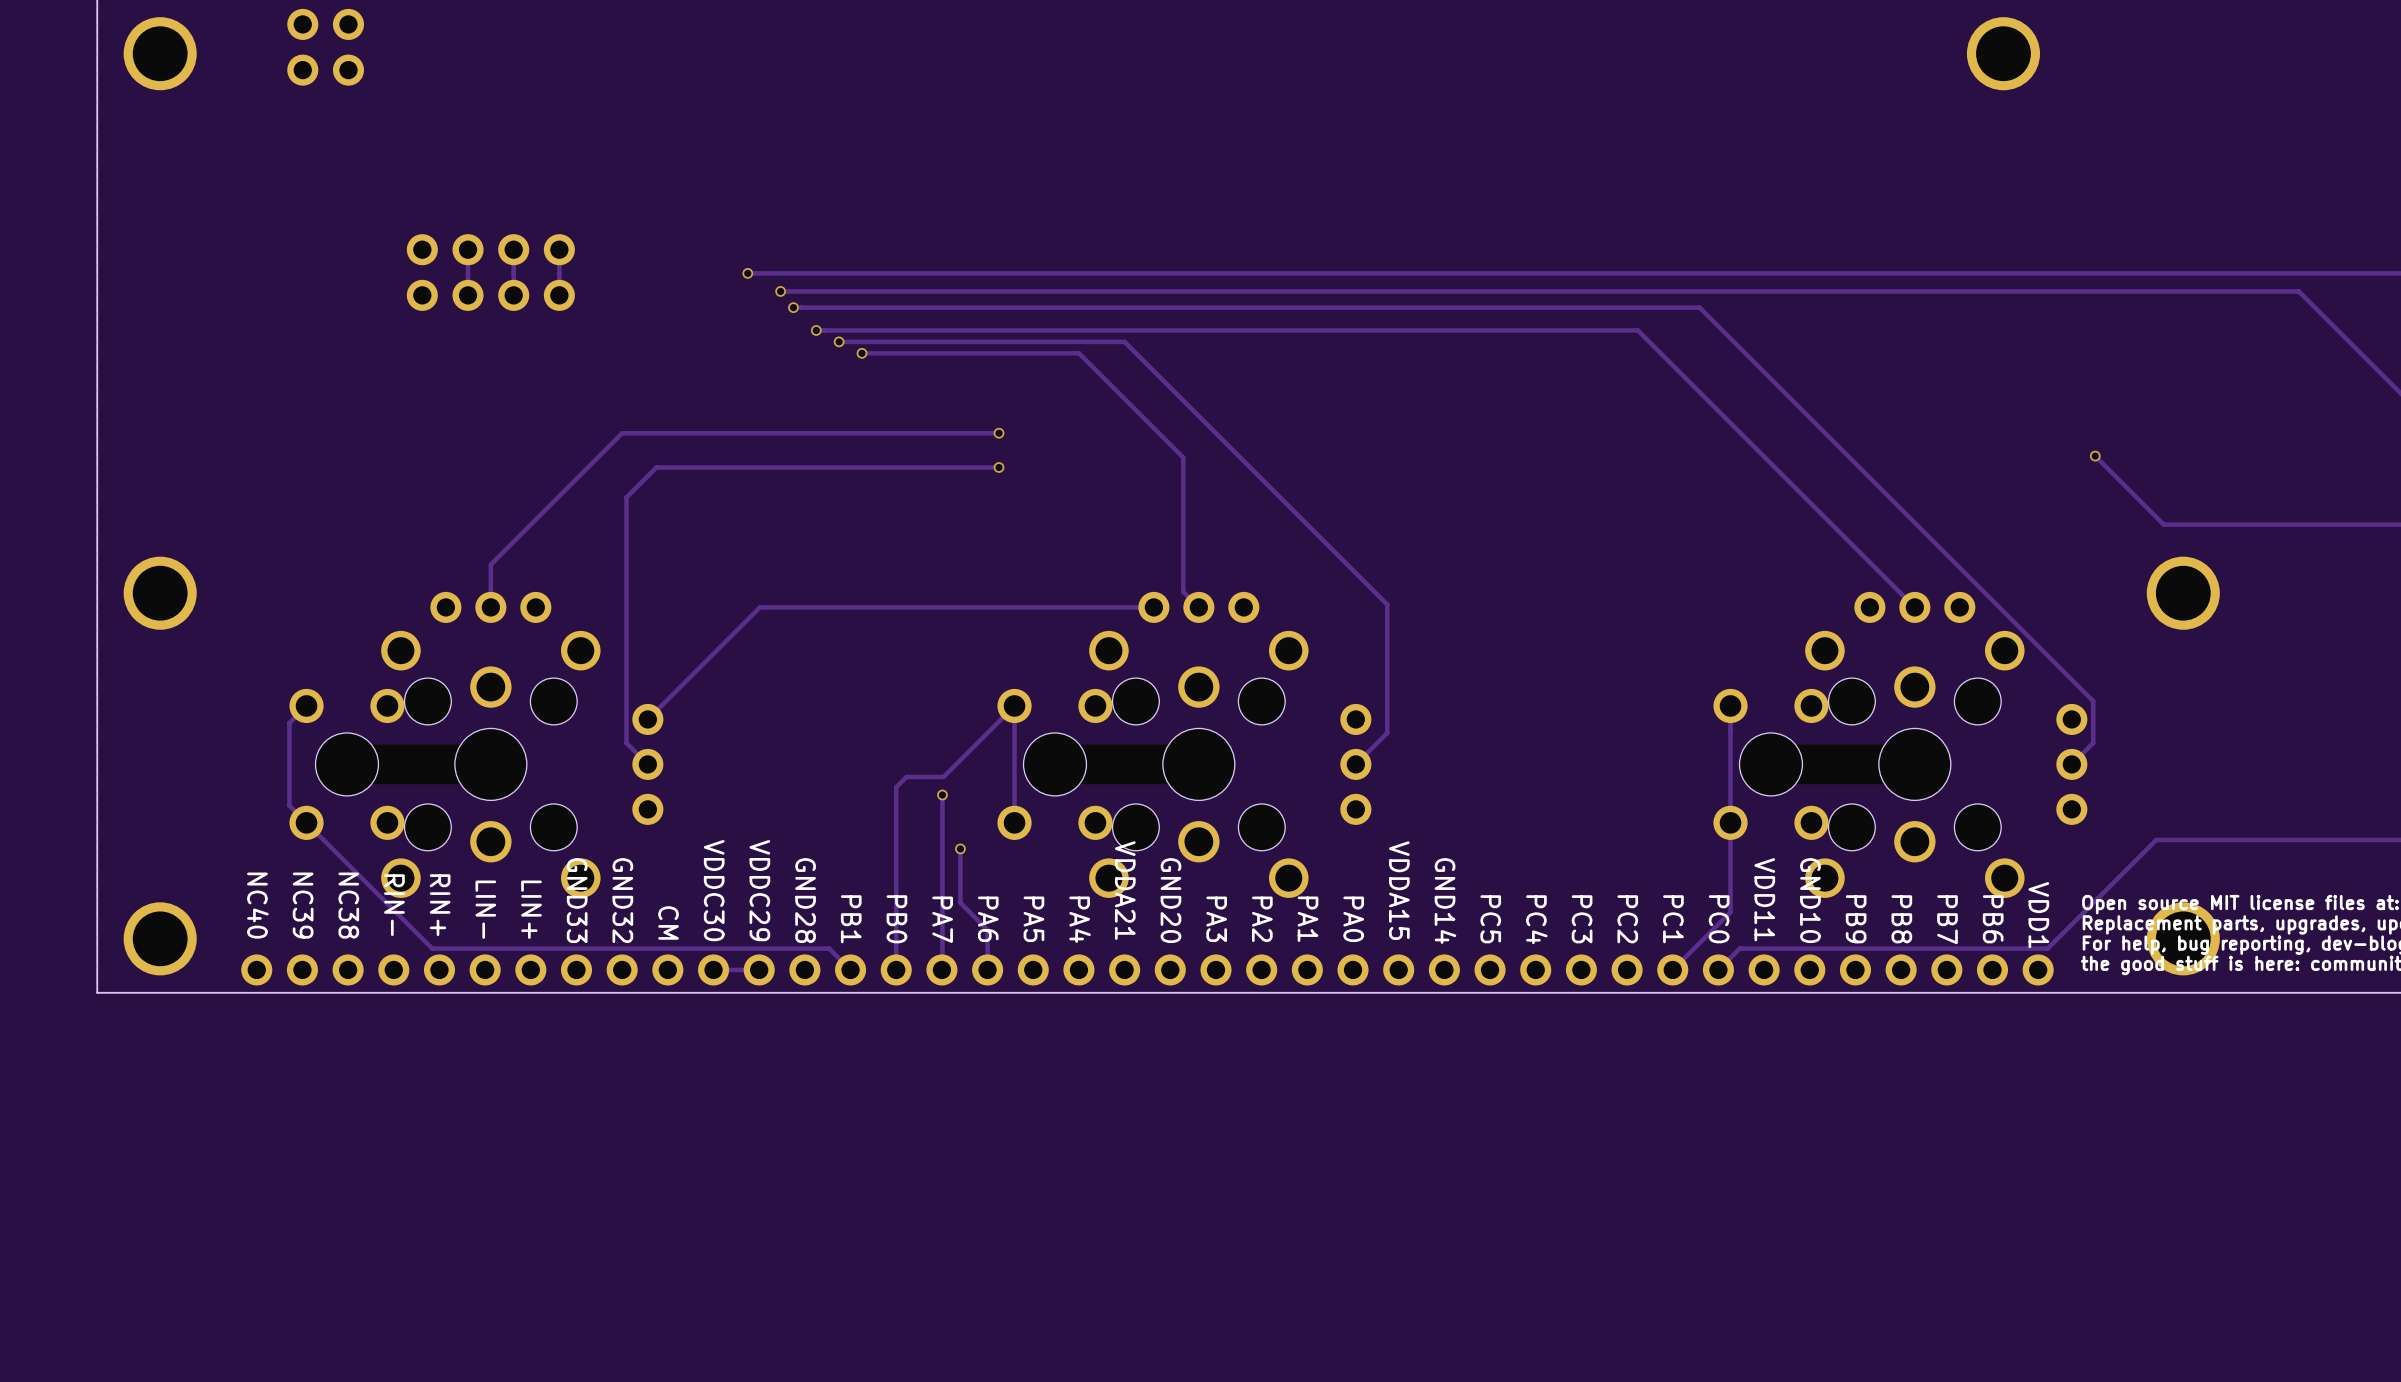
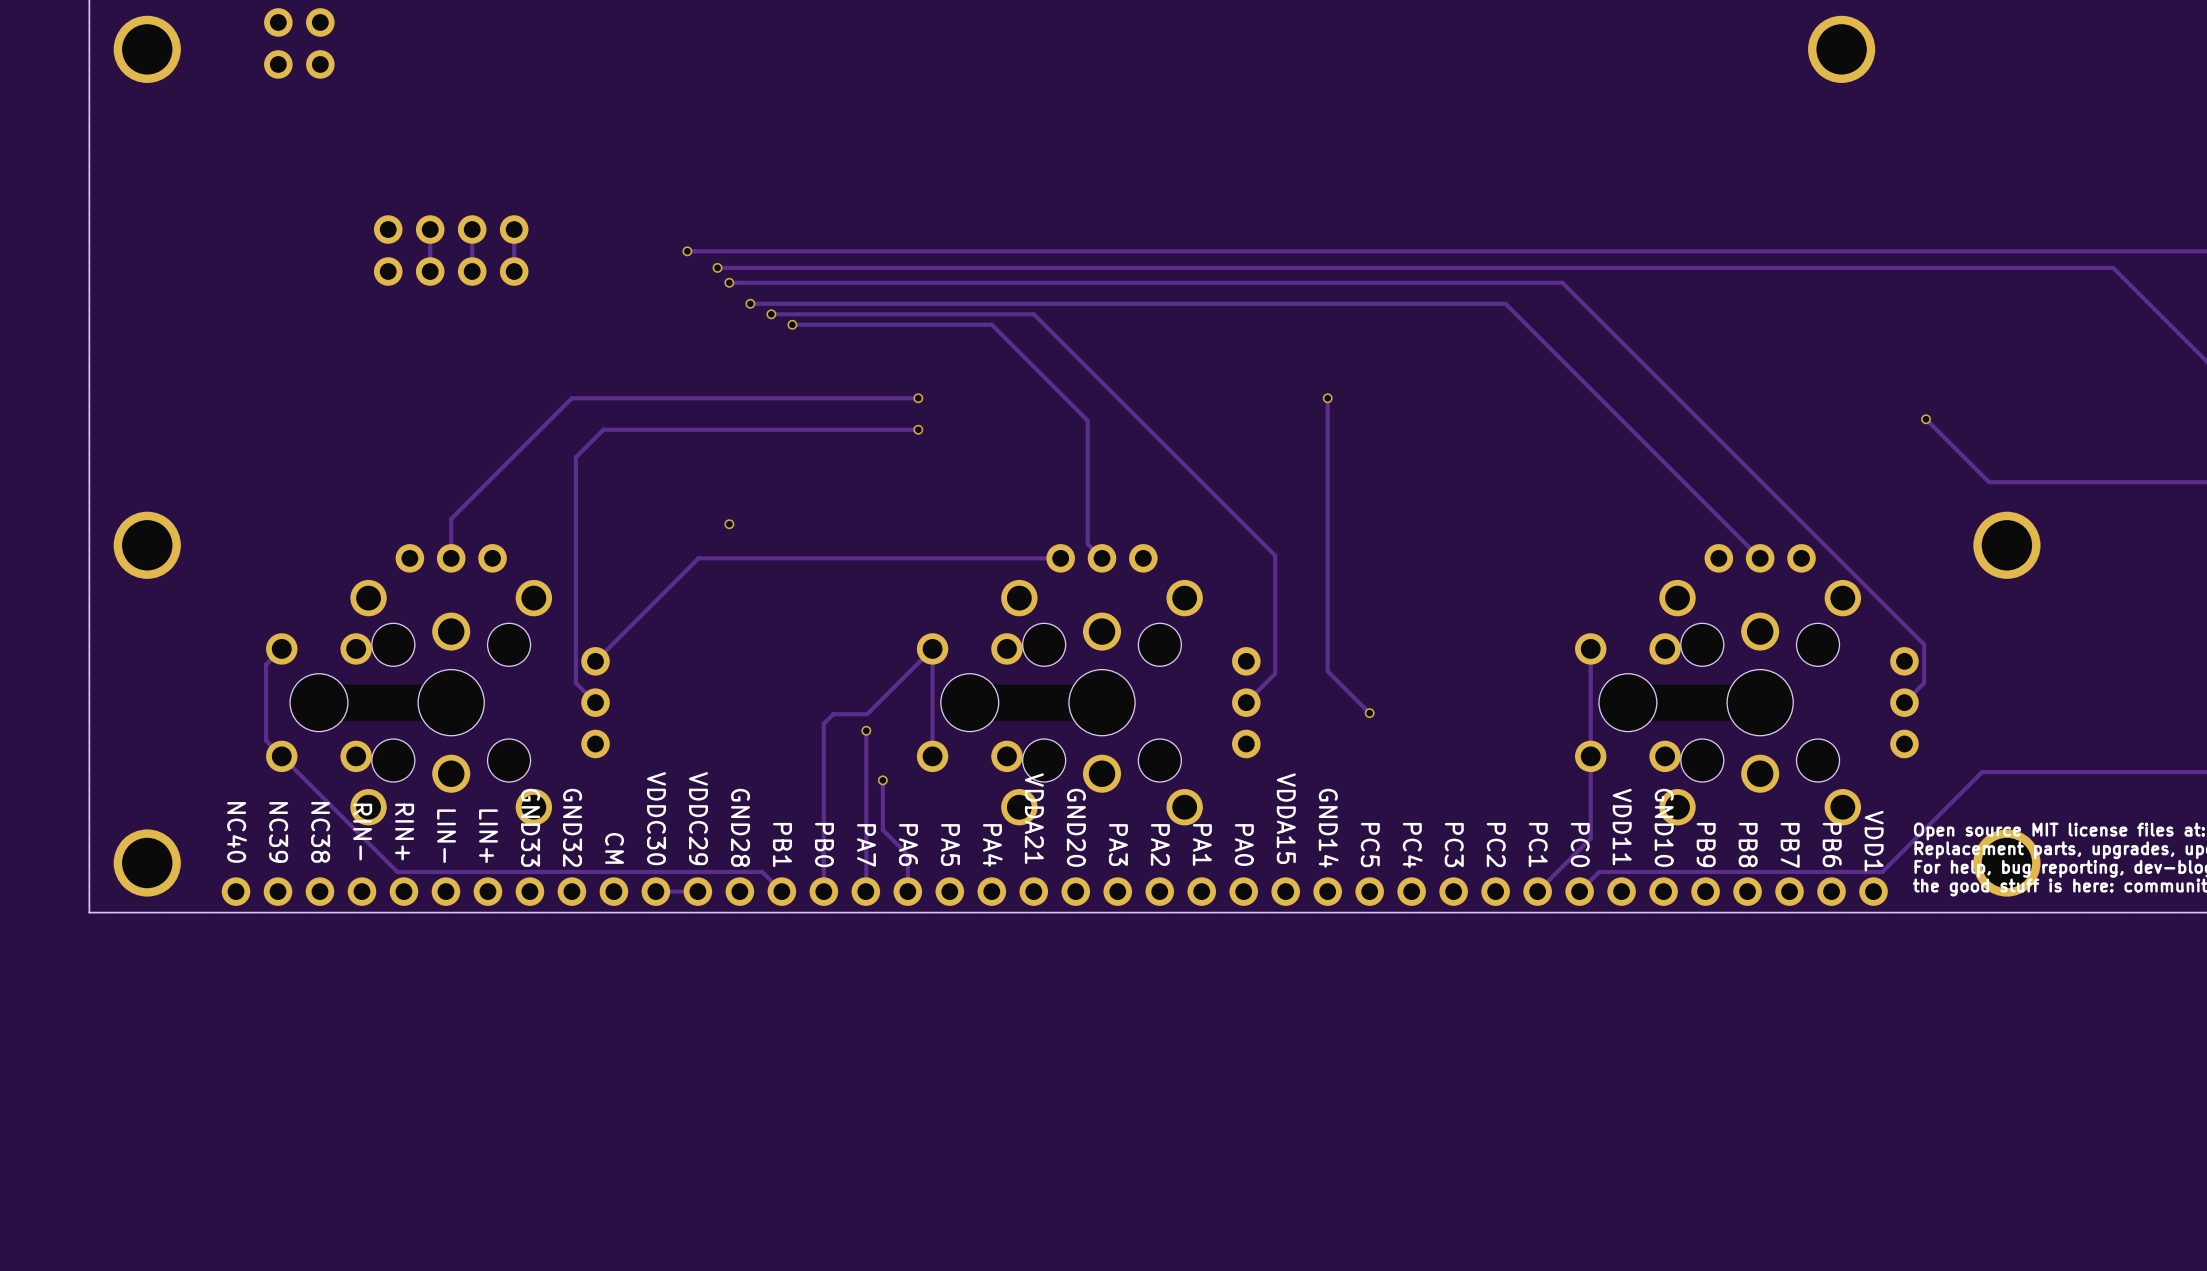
track: none -> (1327, 398) (1327, 671) (1369, 713)
via: none -> (1327, 398)
via: none -> (729, 524)
via: none -> (1369, 713)

